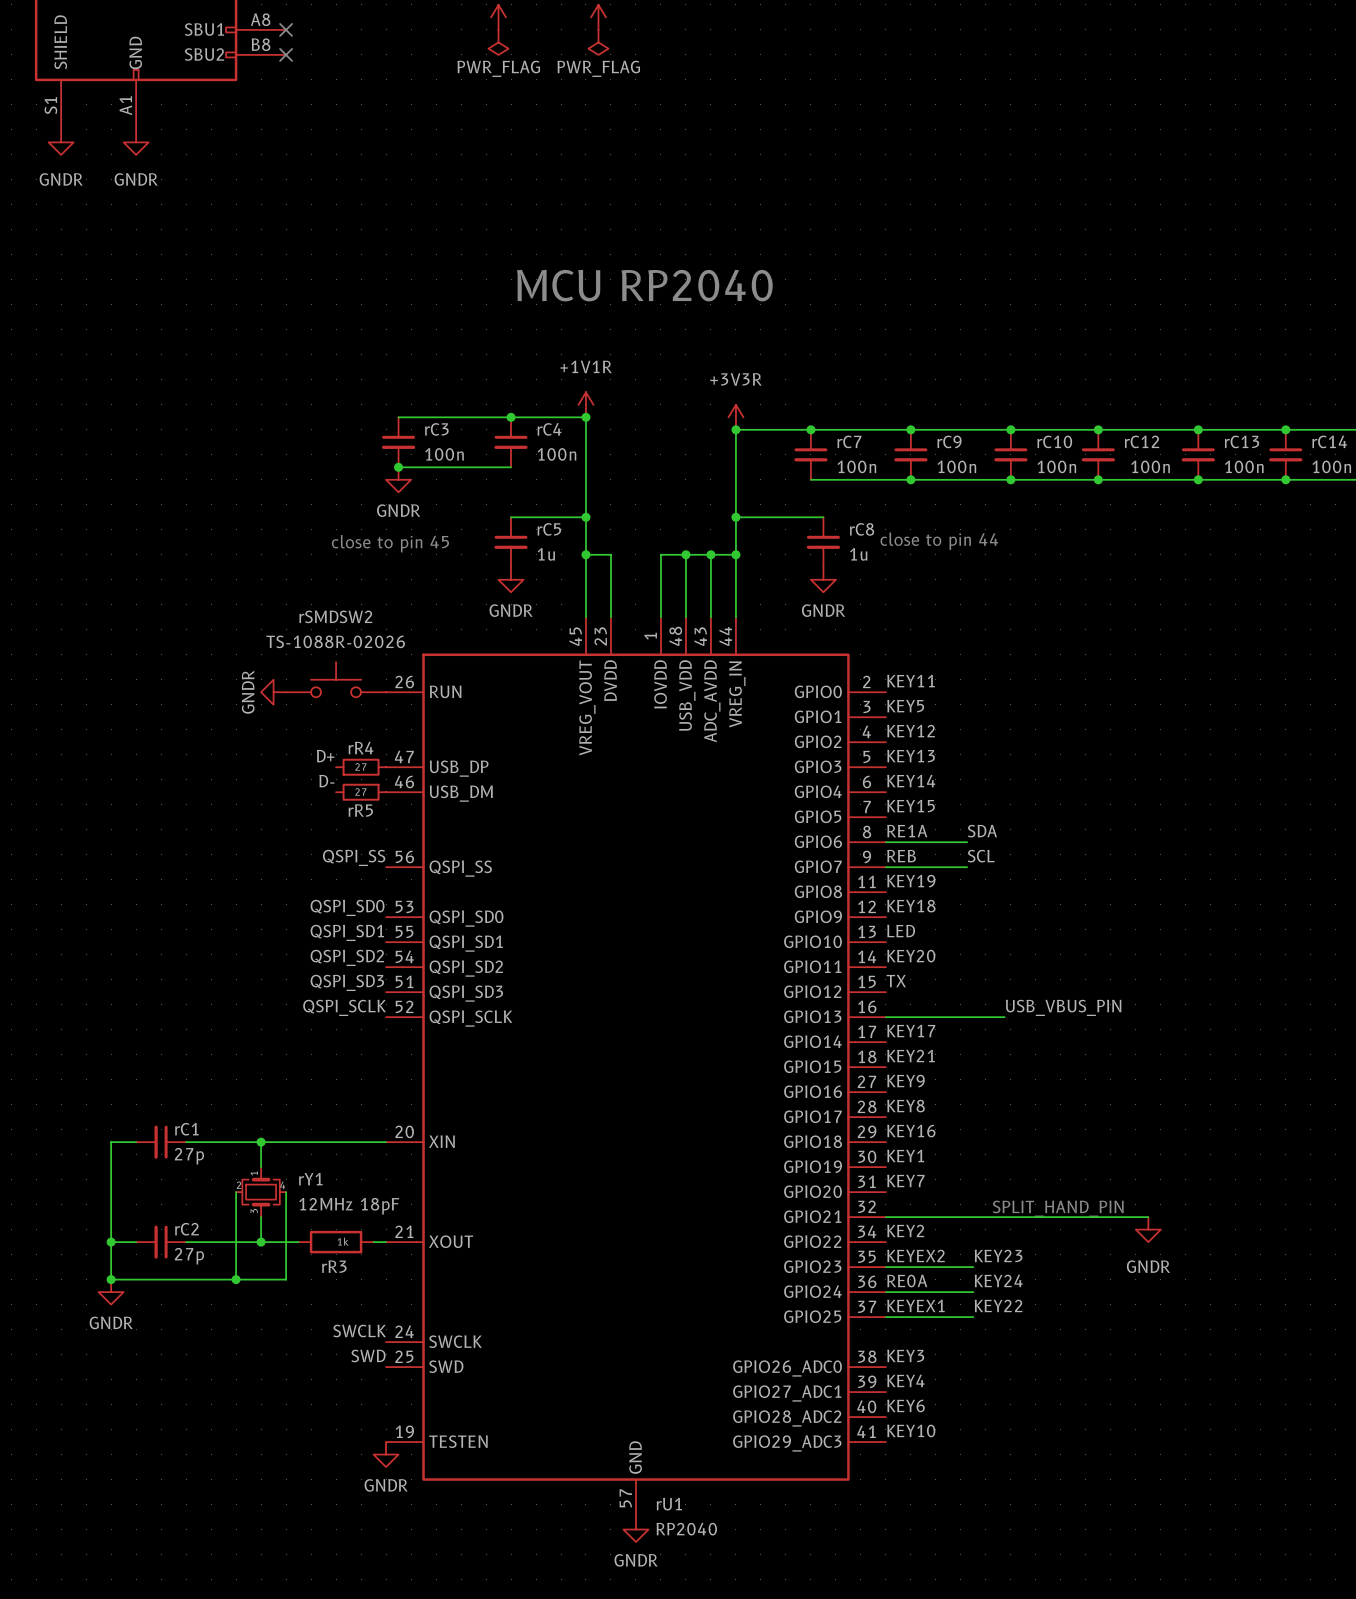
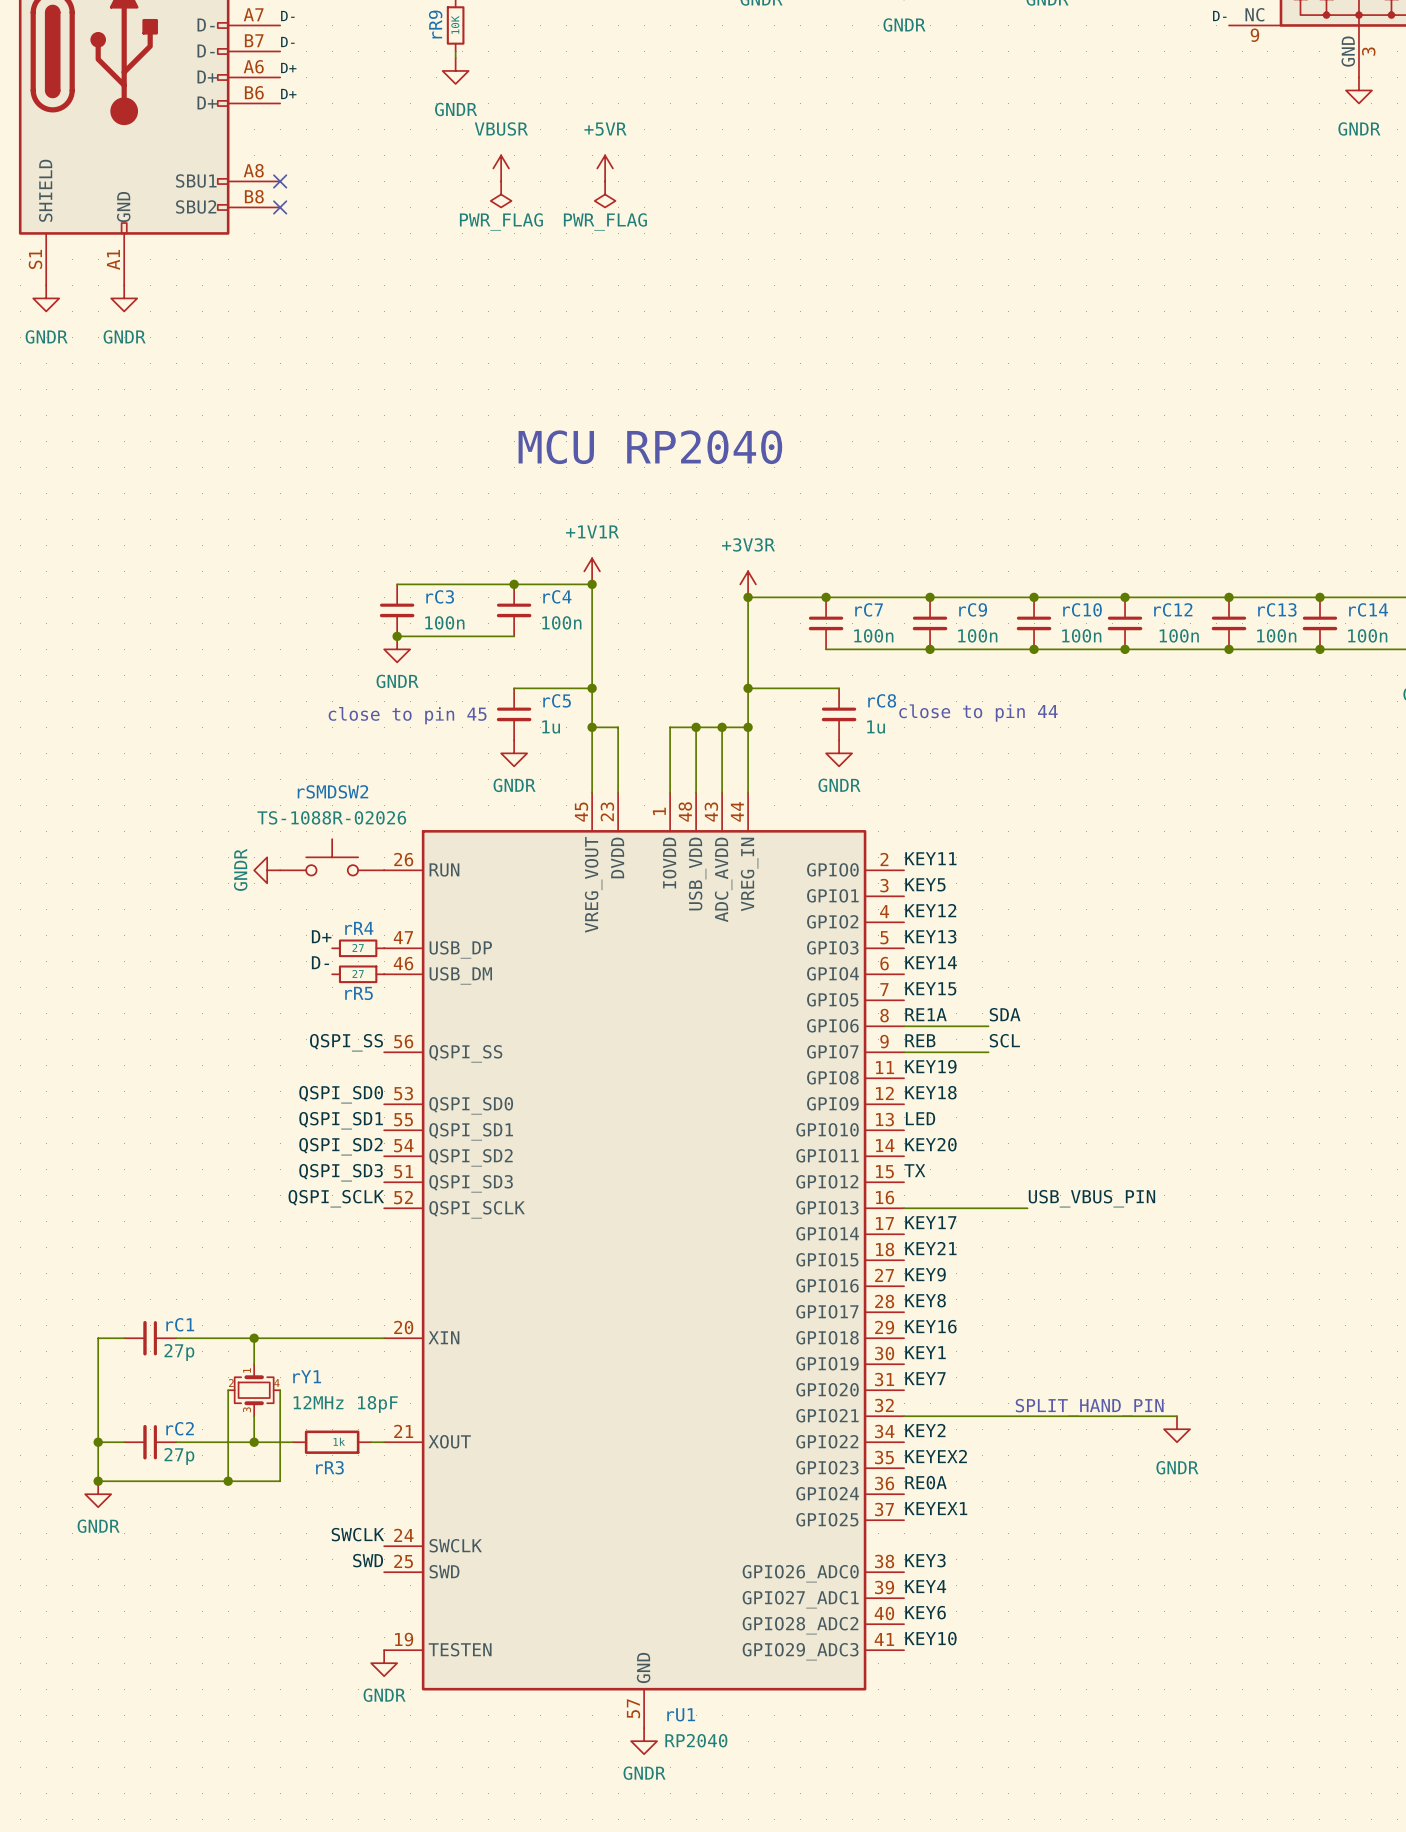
label: KEY23 (998, 1255) -> none
wire: (885, 1267) (973, 1267) -> none
label: KEY24 (998, 1280) -> none
wire: (885, 1292) (973, 1292) -> none
label: KEY22 (998, 1305) -> none
wire: (885, 1317) (973, 1317) -> none

